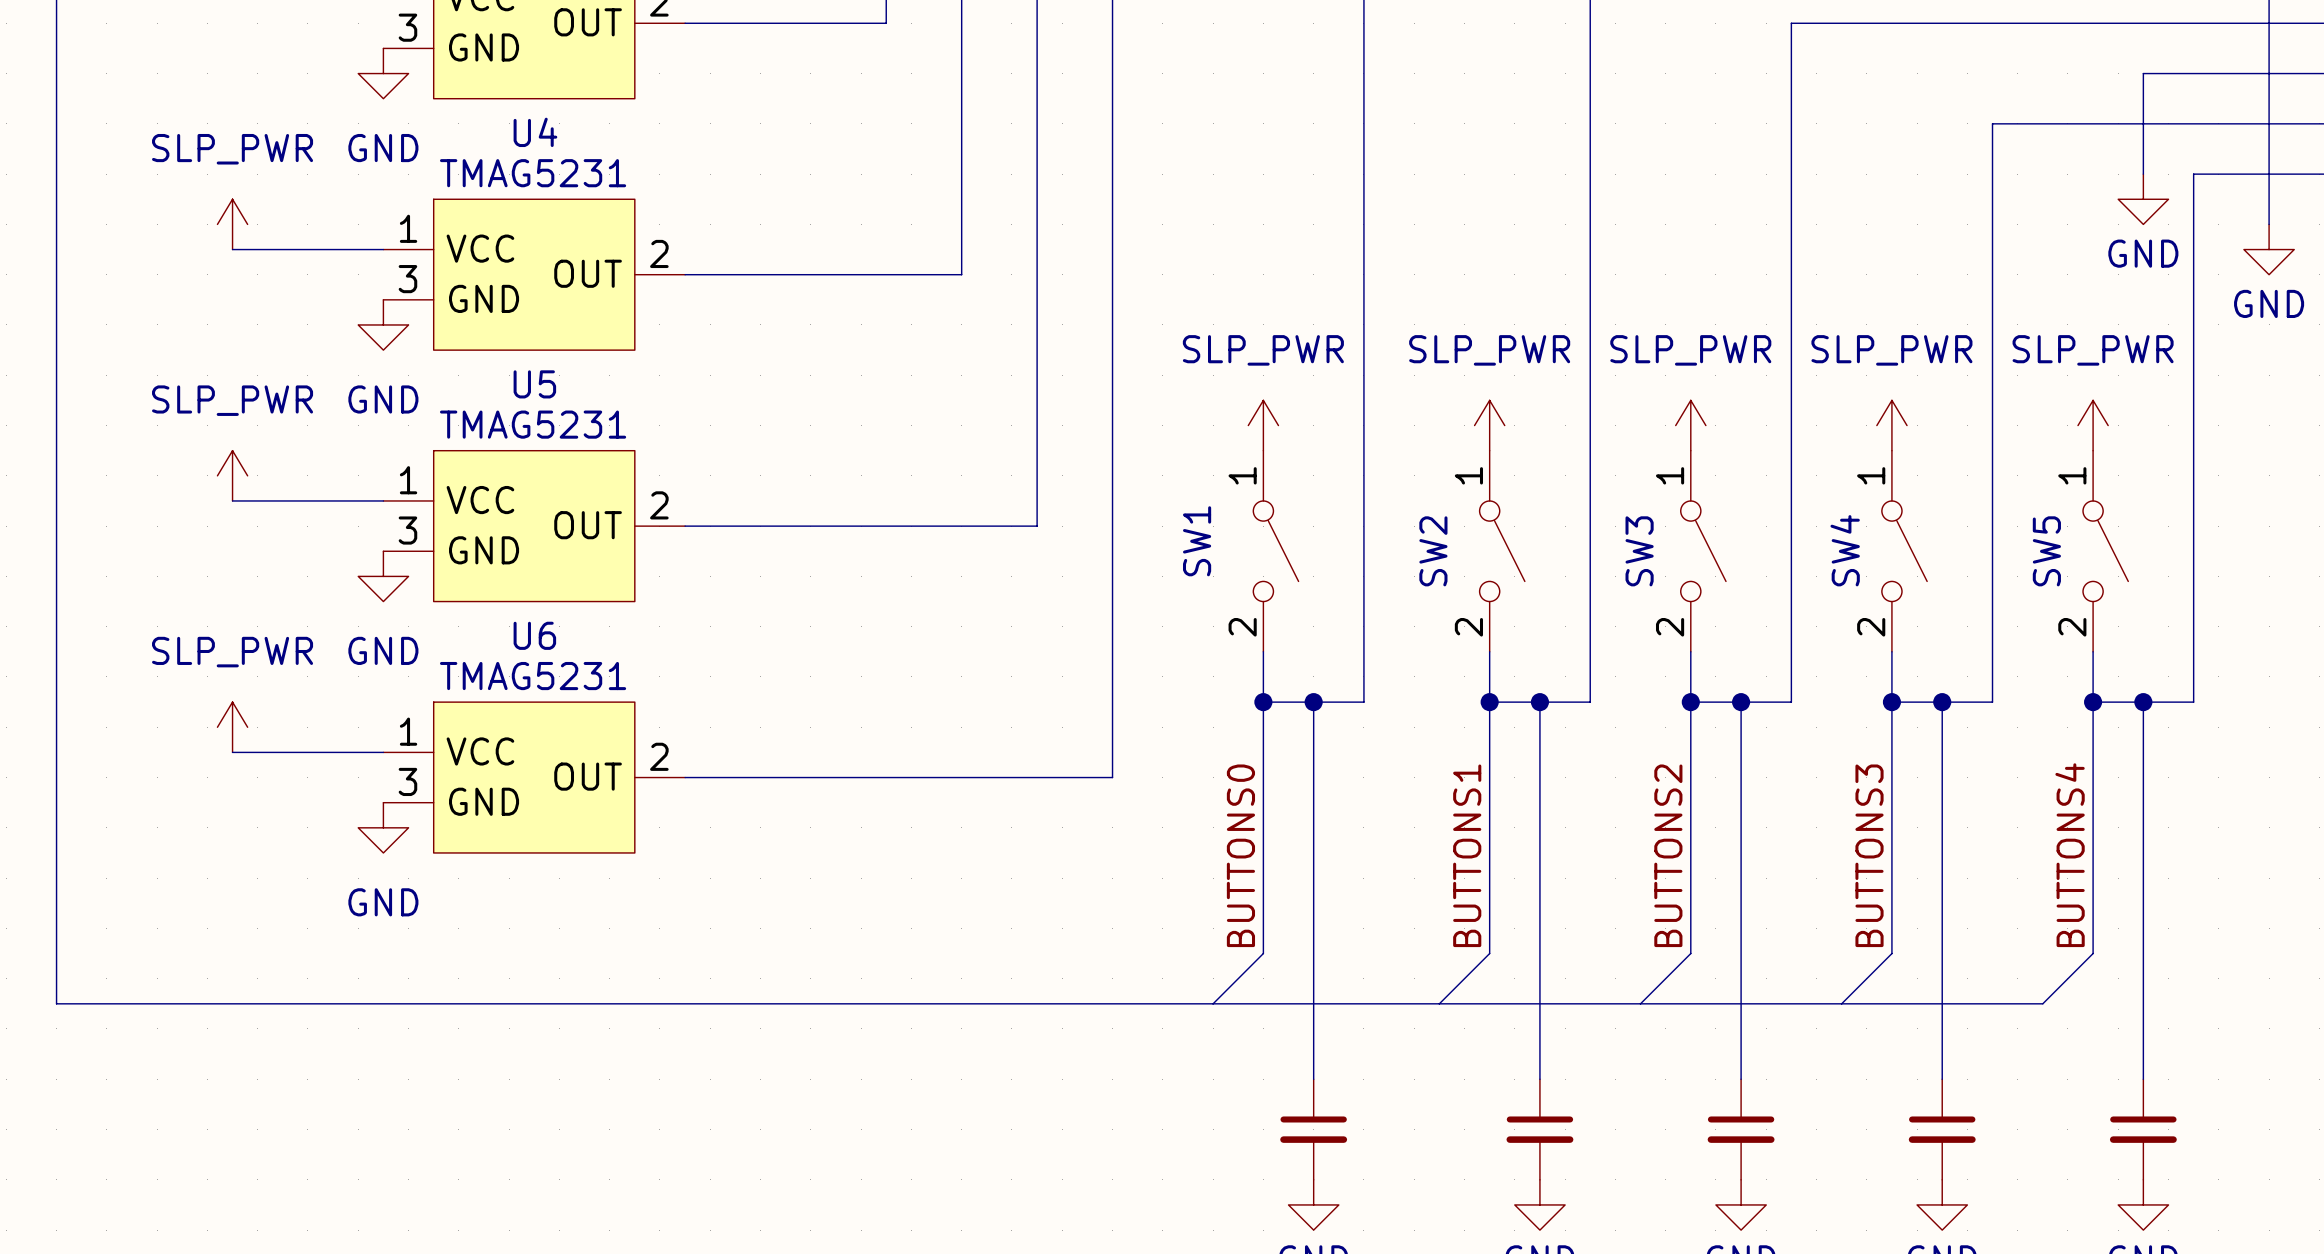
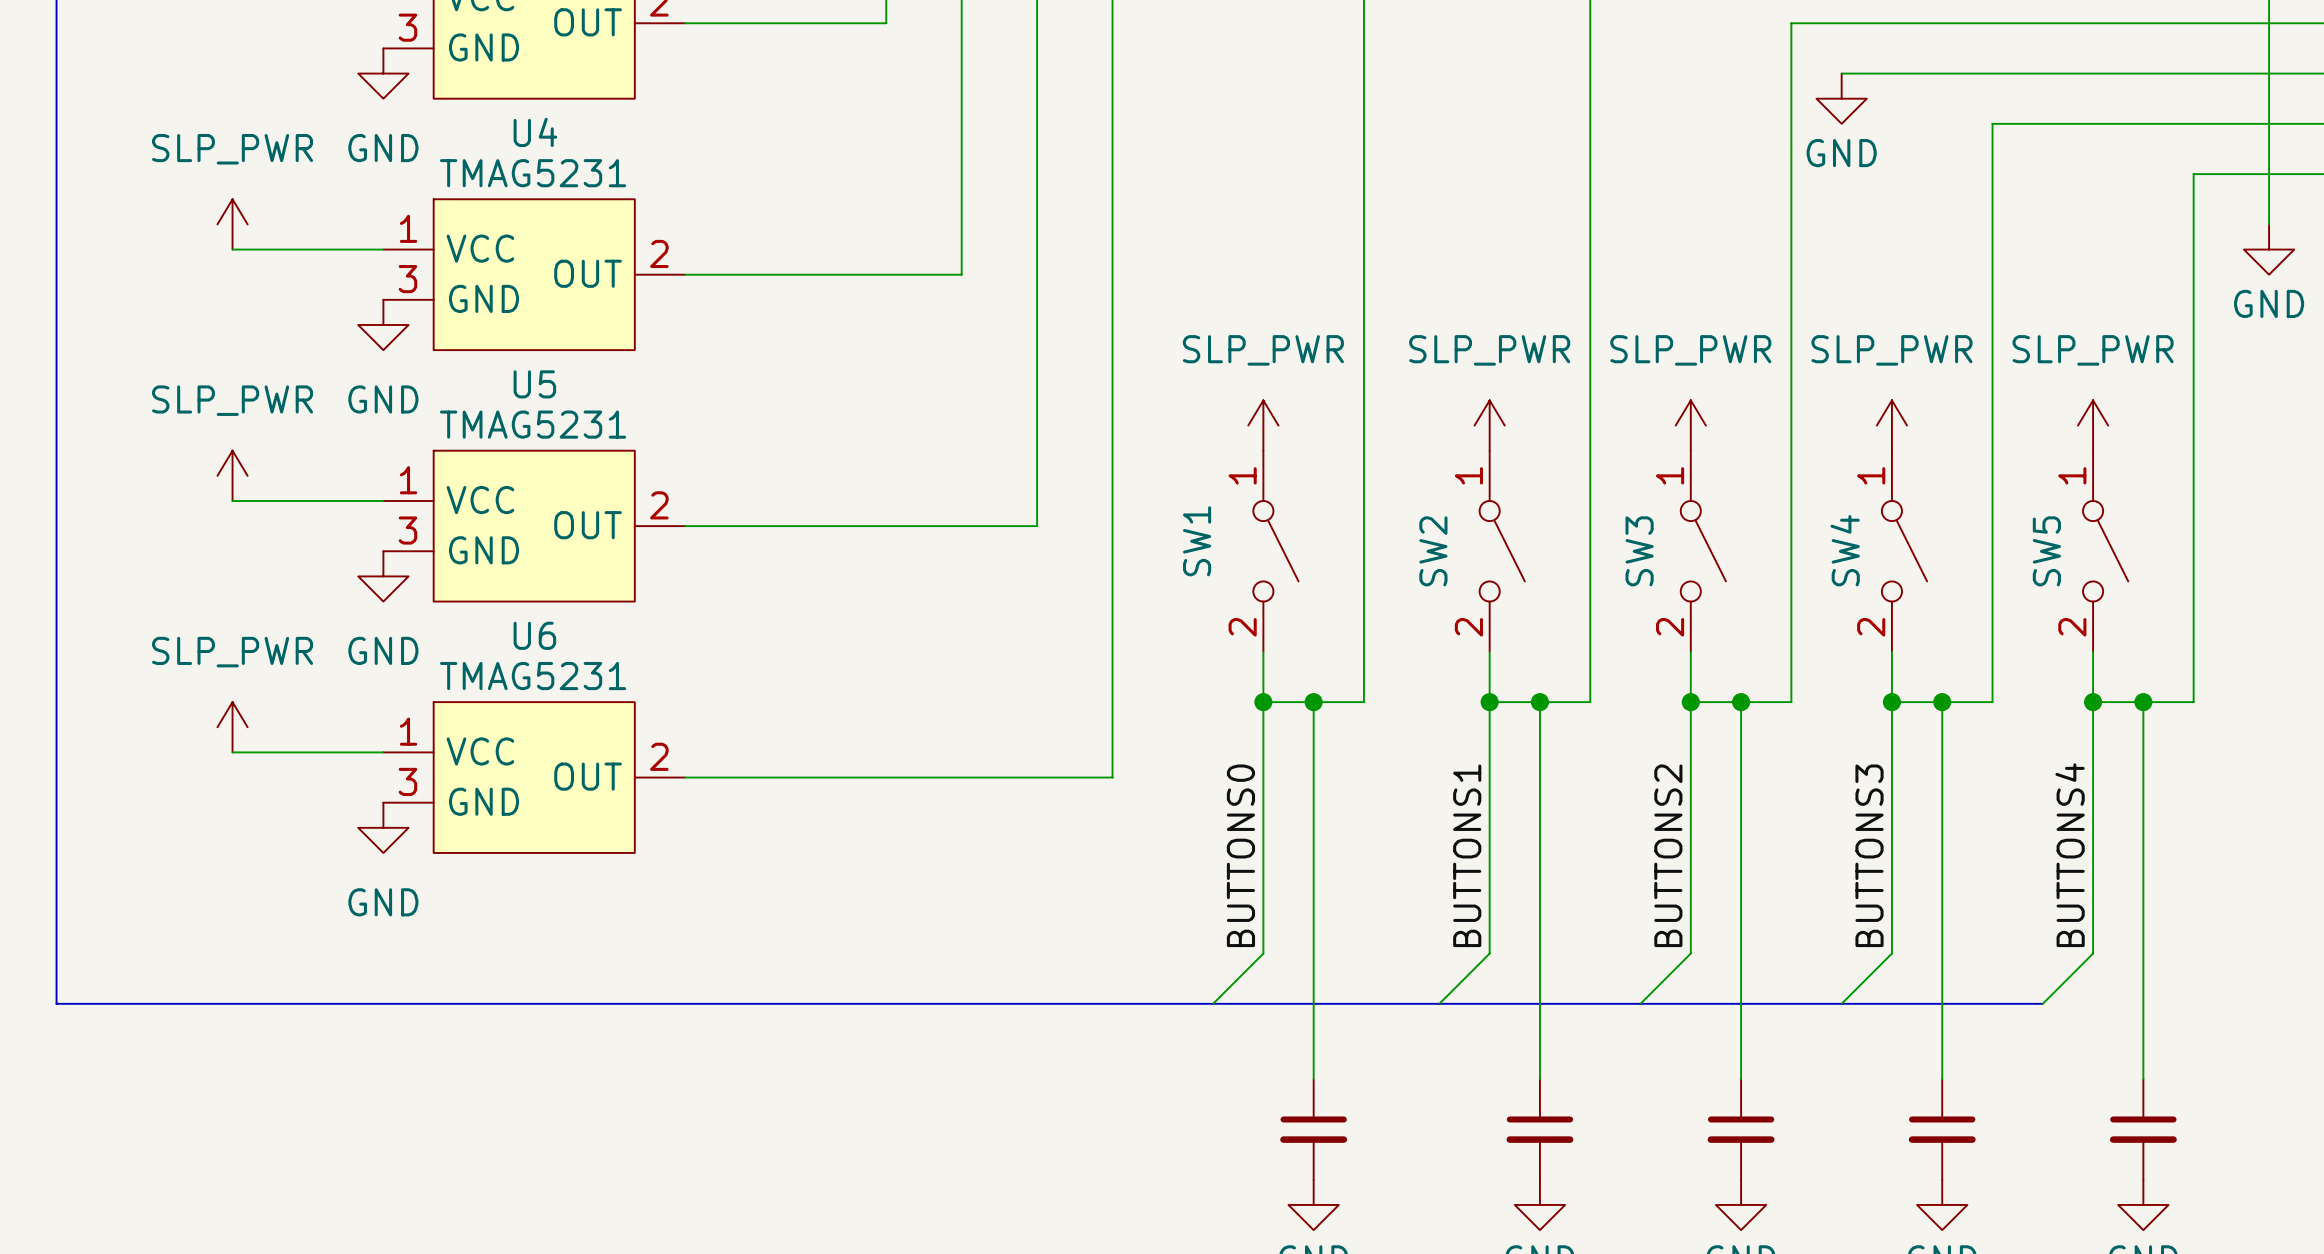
wire: (2143, 73) (2143, 174) -> (2143, 73) (1841, 73)
power symbol position: GND (2143, 199) -> GND (1841, 98)

